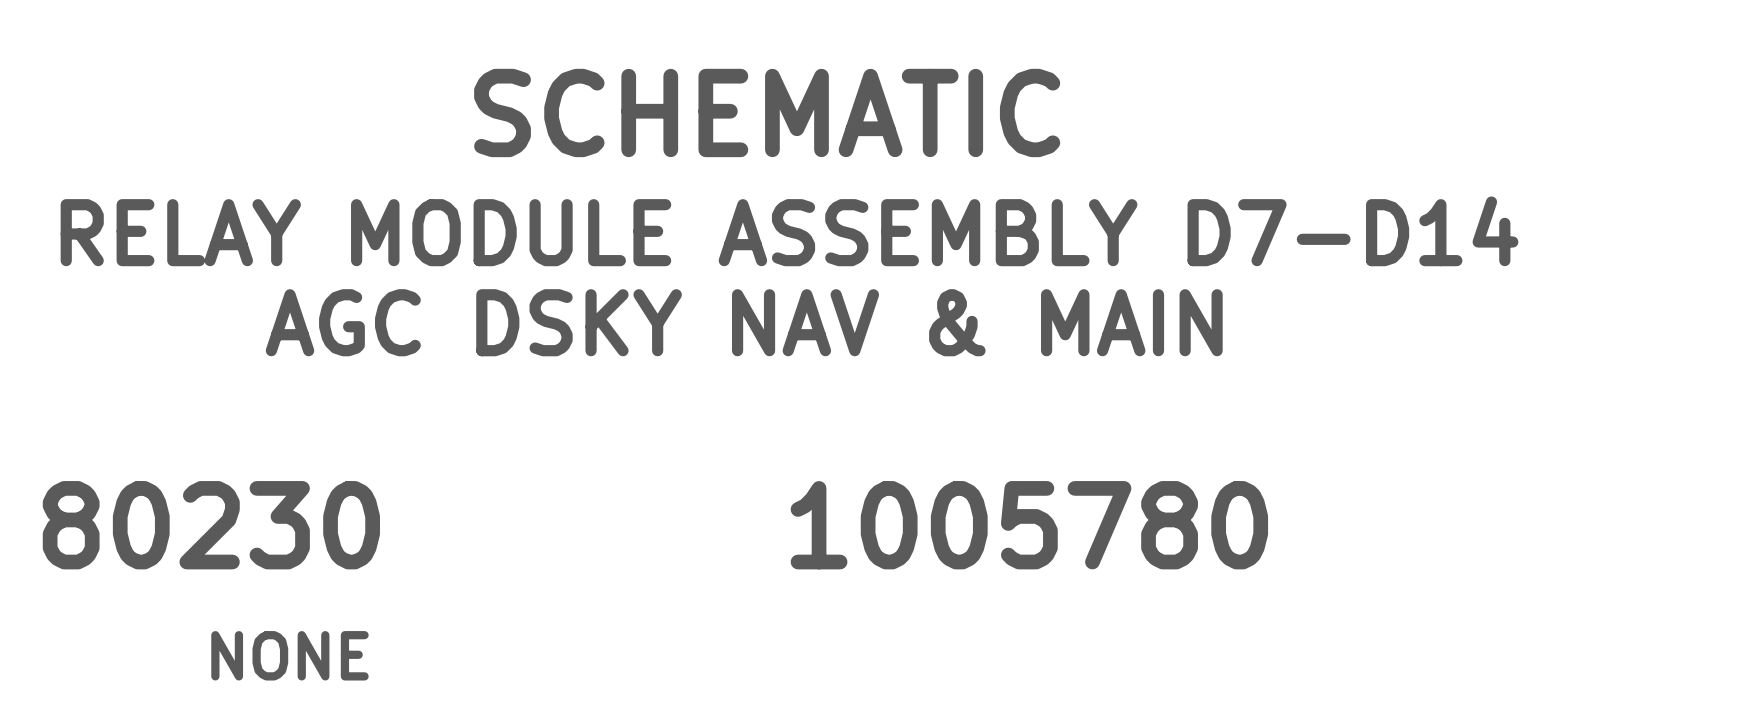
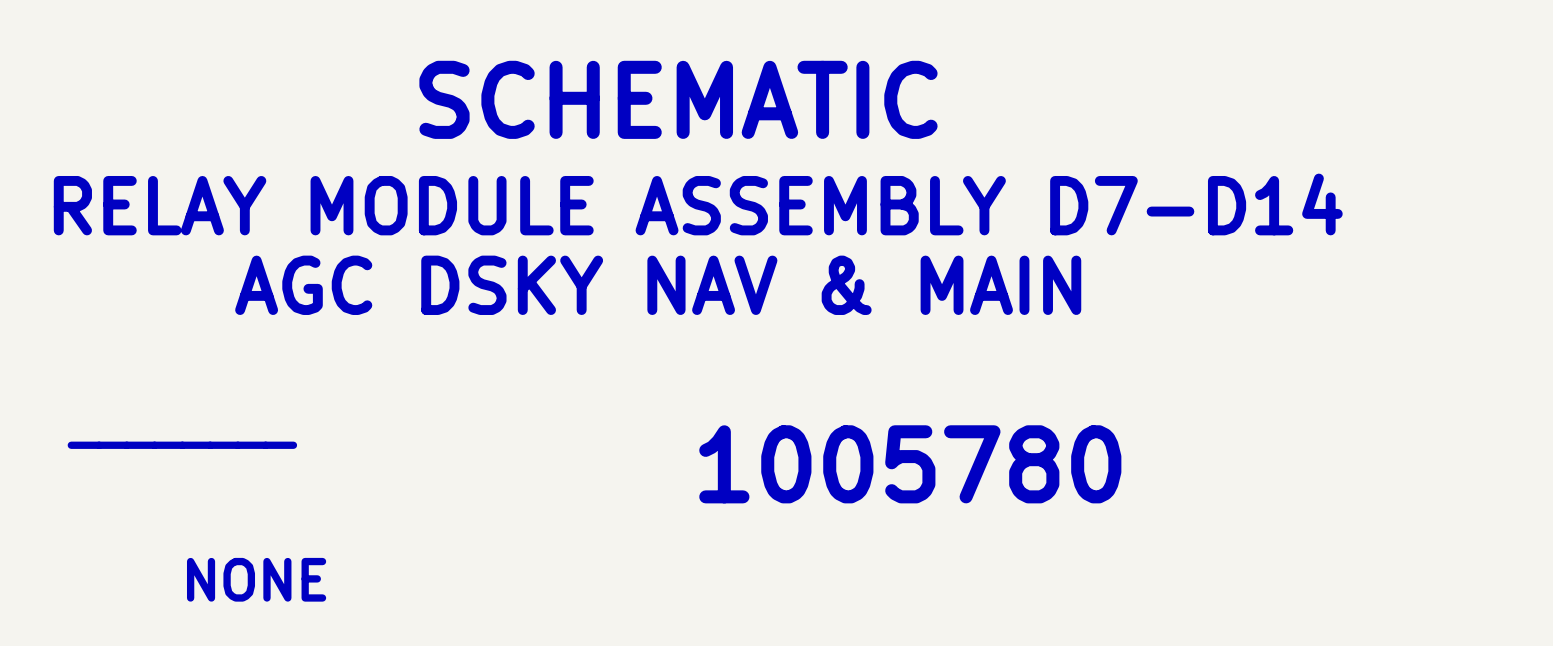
text: none -> ________ (182, 445)
text: 80230 (211, 525) -> none

